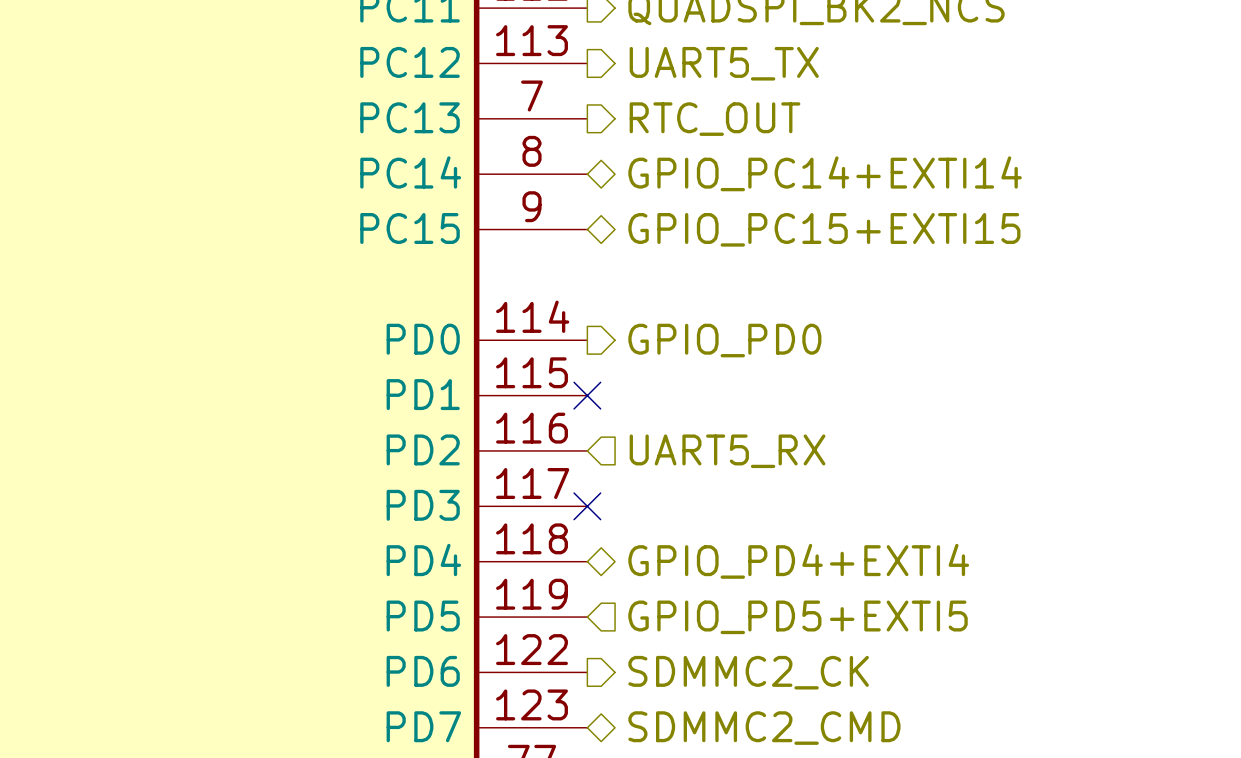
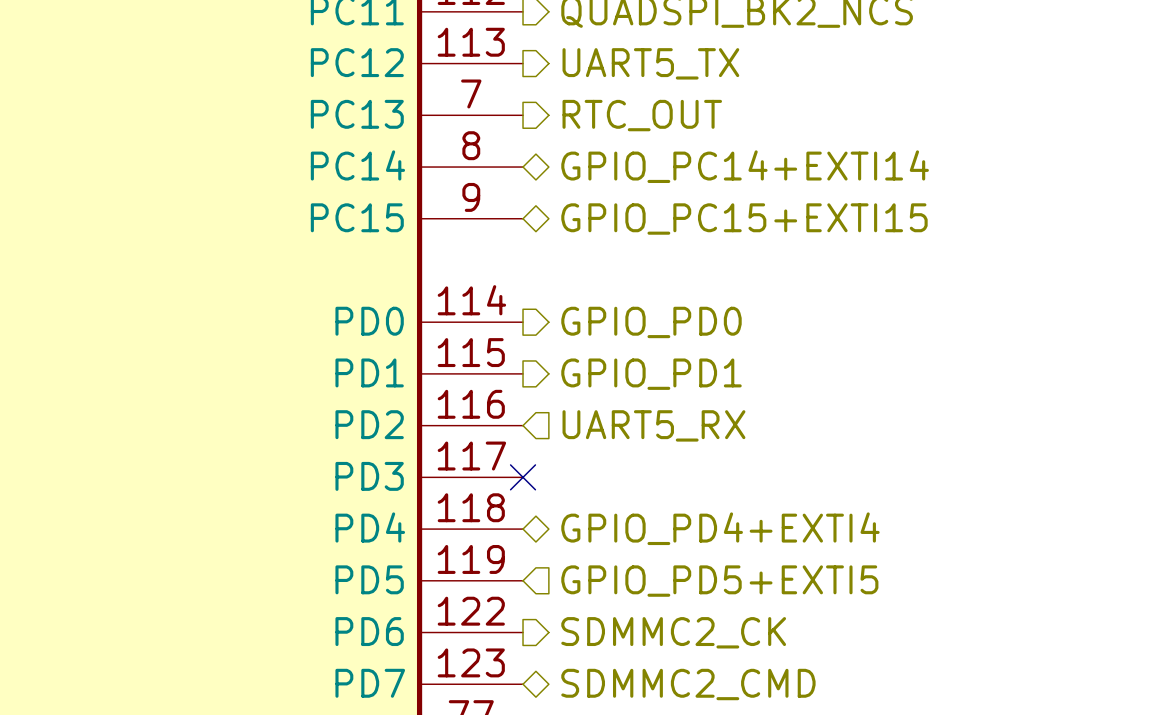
no-connect mark: (587, 395) -> none
hierarchical label: none -> GPIO_PD1 (651, 374)

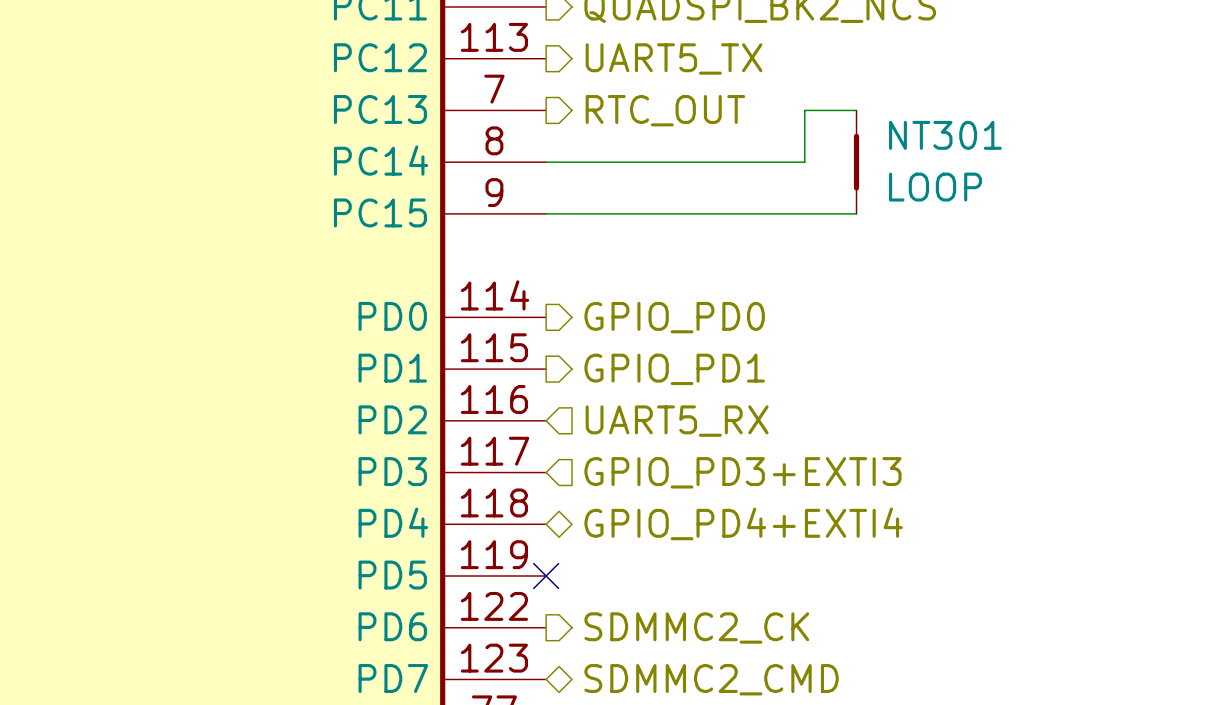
wire: none -> (856, 110) (804, 110) (804, 162) (546, 162)
hierarchical label: GPIO_PC14+EXTI14 (745, 166) -> none
NT301: none -> LOOP (856, 162)
wire: none -> (546, 213) (856, 213)
hierarchical label: GPIO_PC15+EXTI15 (744, 219) -> none
no-connect mark position: (523, 477) -> (546, 576)
hierarchical label: none -> GPIO_PD3+EXTI3 (743, 472)
hierarchical label: GPIO_PD5+EXTI5 (719, 581) -> none

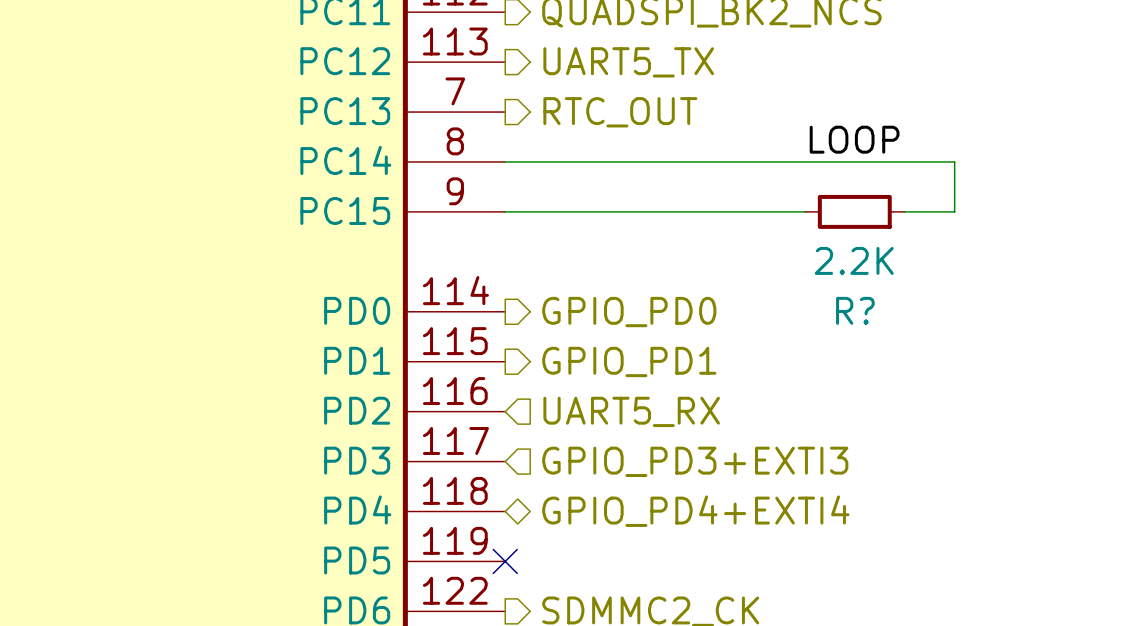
wire: (856, 110) (804, 110) (804, 162) -> (904, 211) (954, 211) (954, 161) (754, 161)
label: none -> LOOP (854, 139)
NT301: LOOP (856, 162) -> none
R?: none -> 2.2K (854, 211)

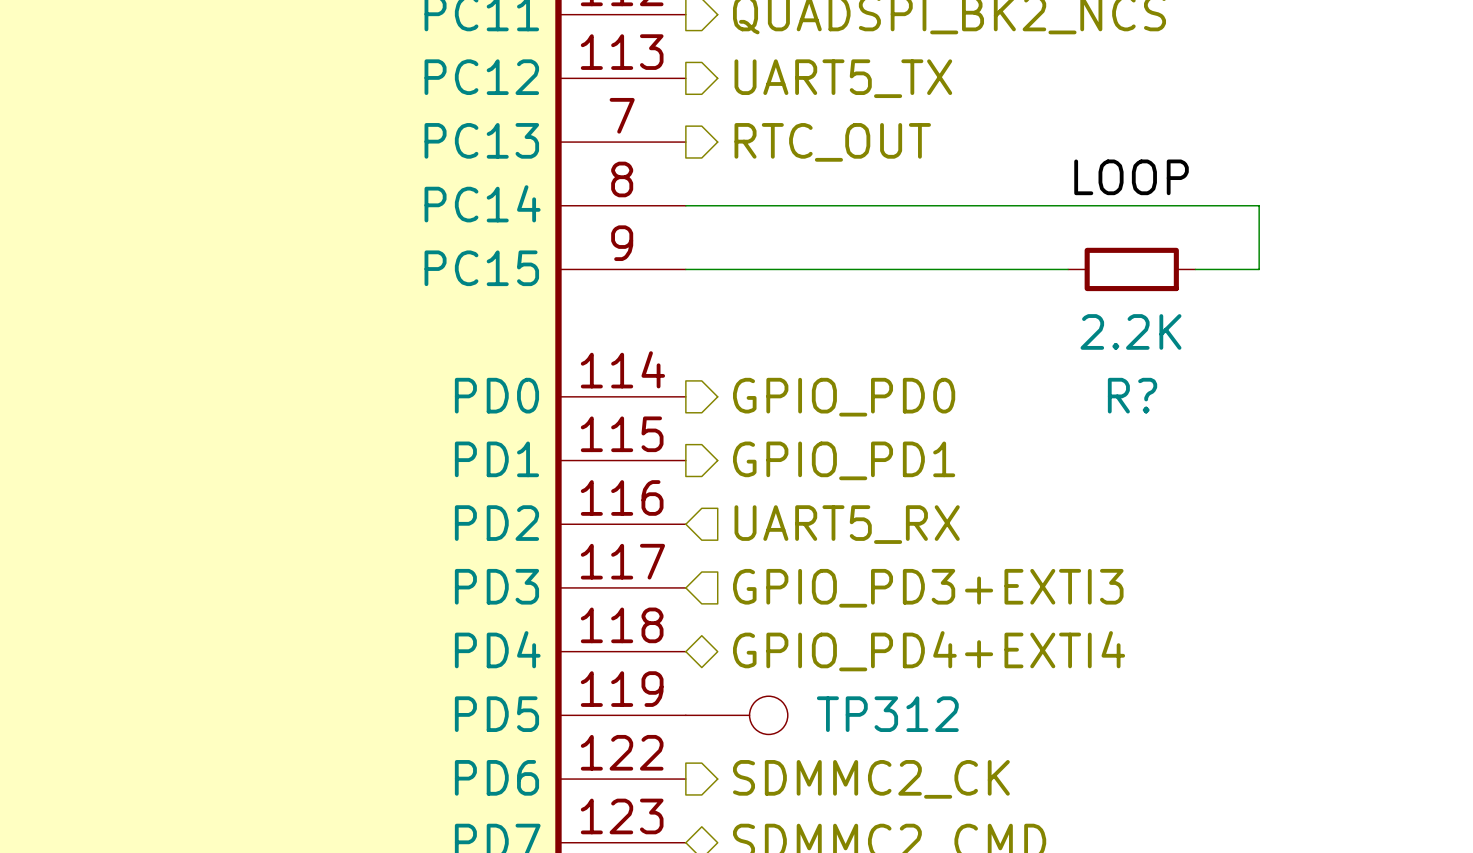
no-connect mark: (505, 561) -> none
TP312: none -> (736, 715)

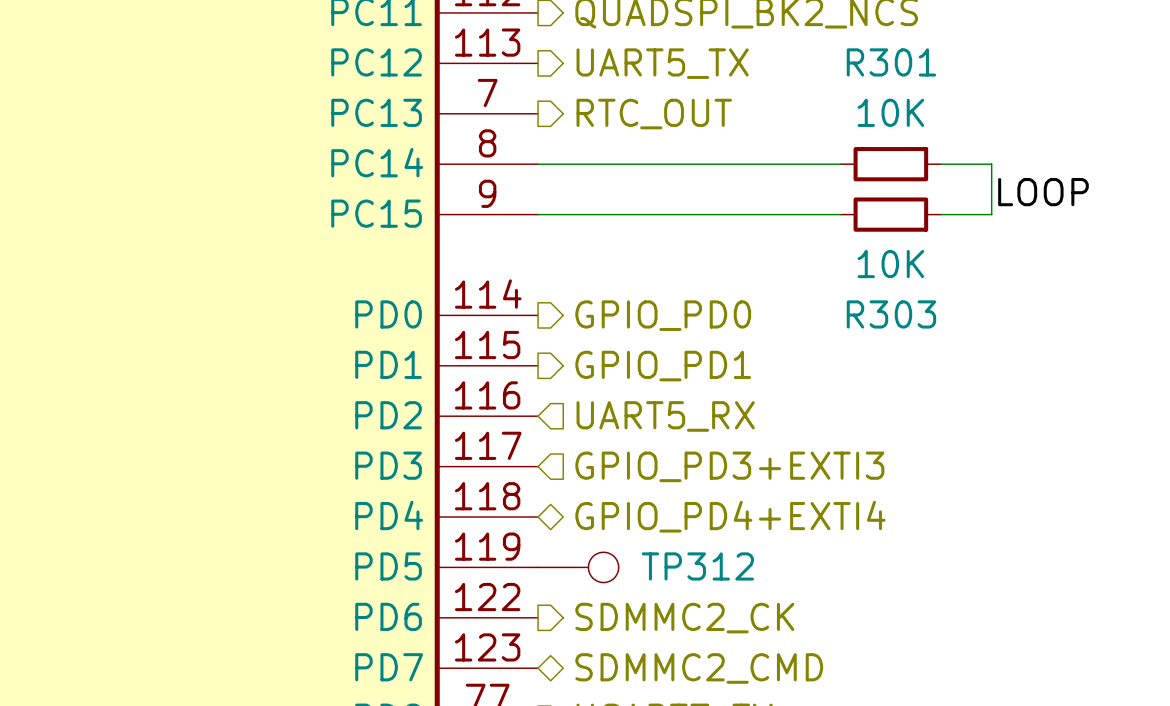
label position: LOOP (1131, 177) -> LOOP (1043, 192)
wire: (1068, 205) (1195, 205) -> none
R301: none -> 10K (890, 164)
R? value: 2.2K (1131, 331) -> 10K (890, 264)
R? name: R? (1132, 395) -> R303 (891, 314)

